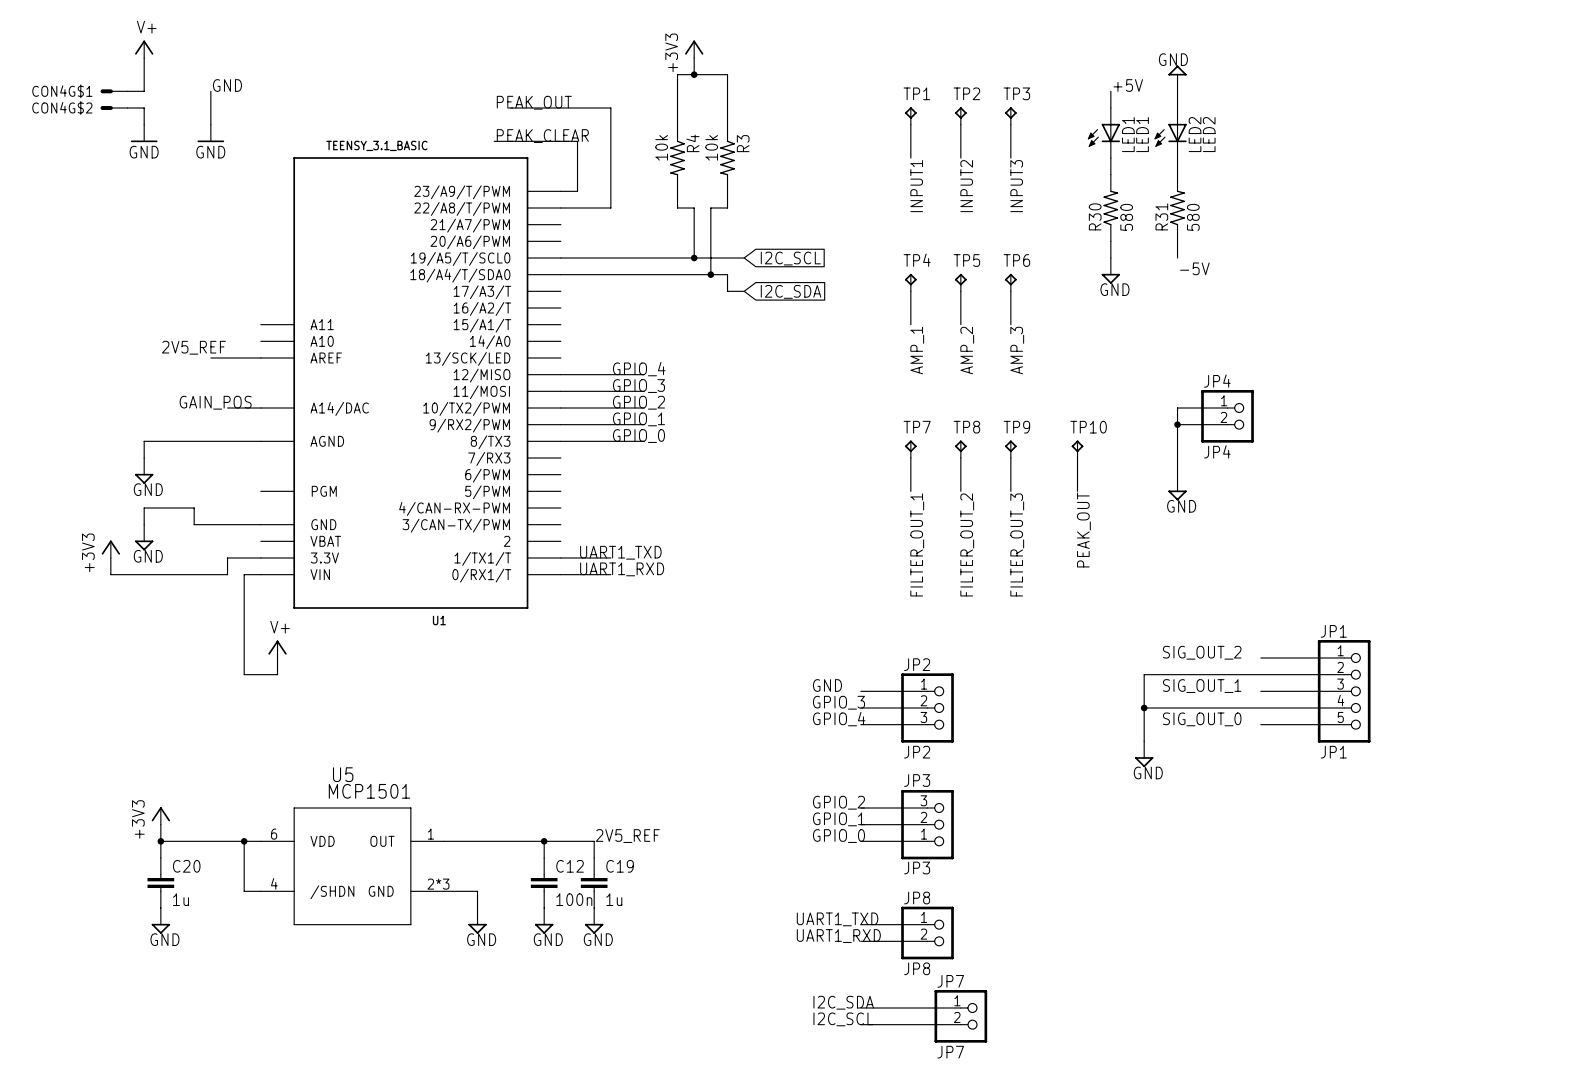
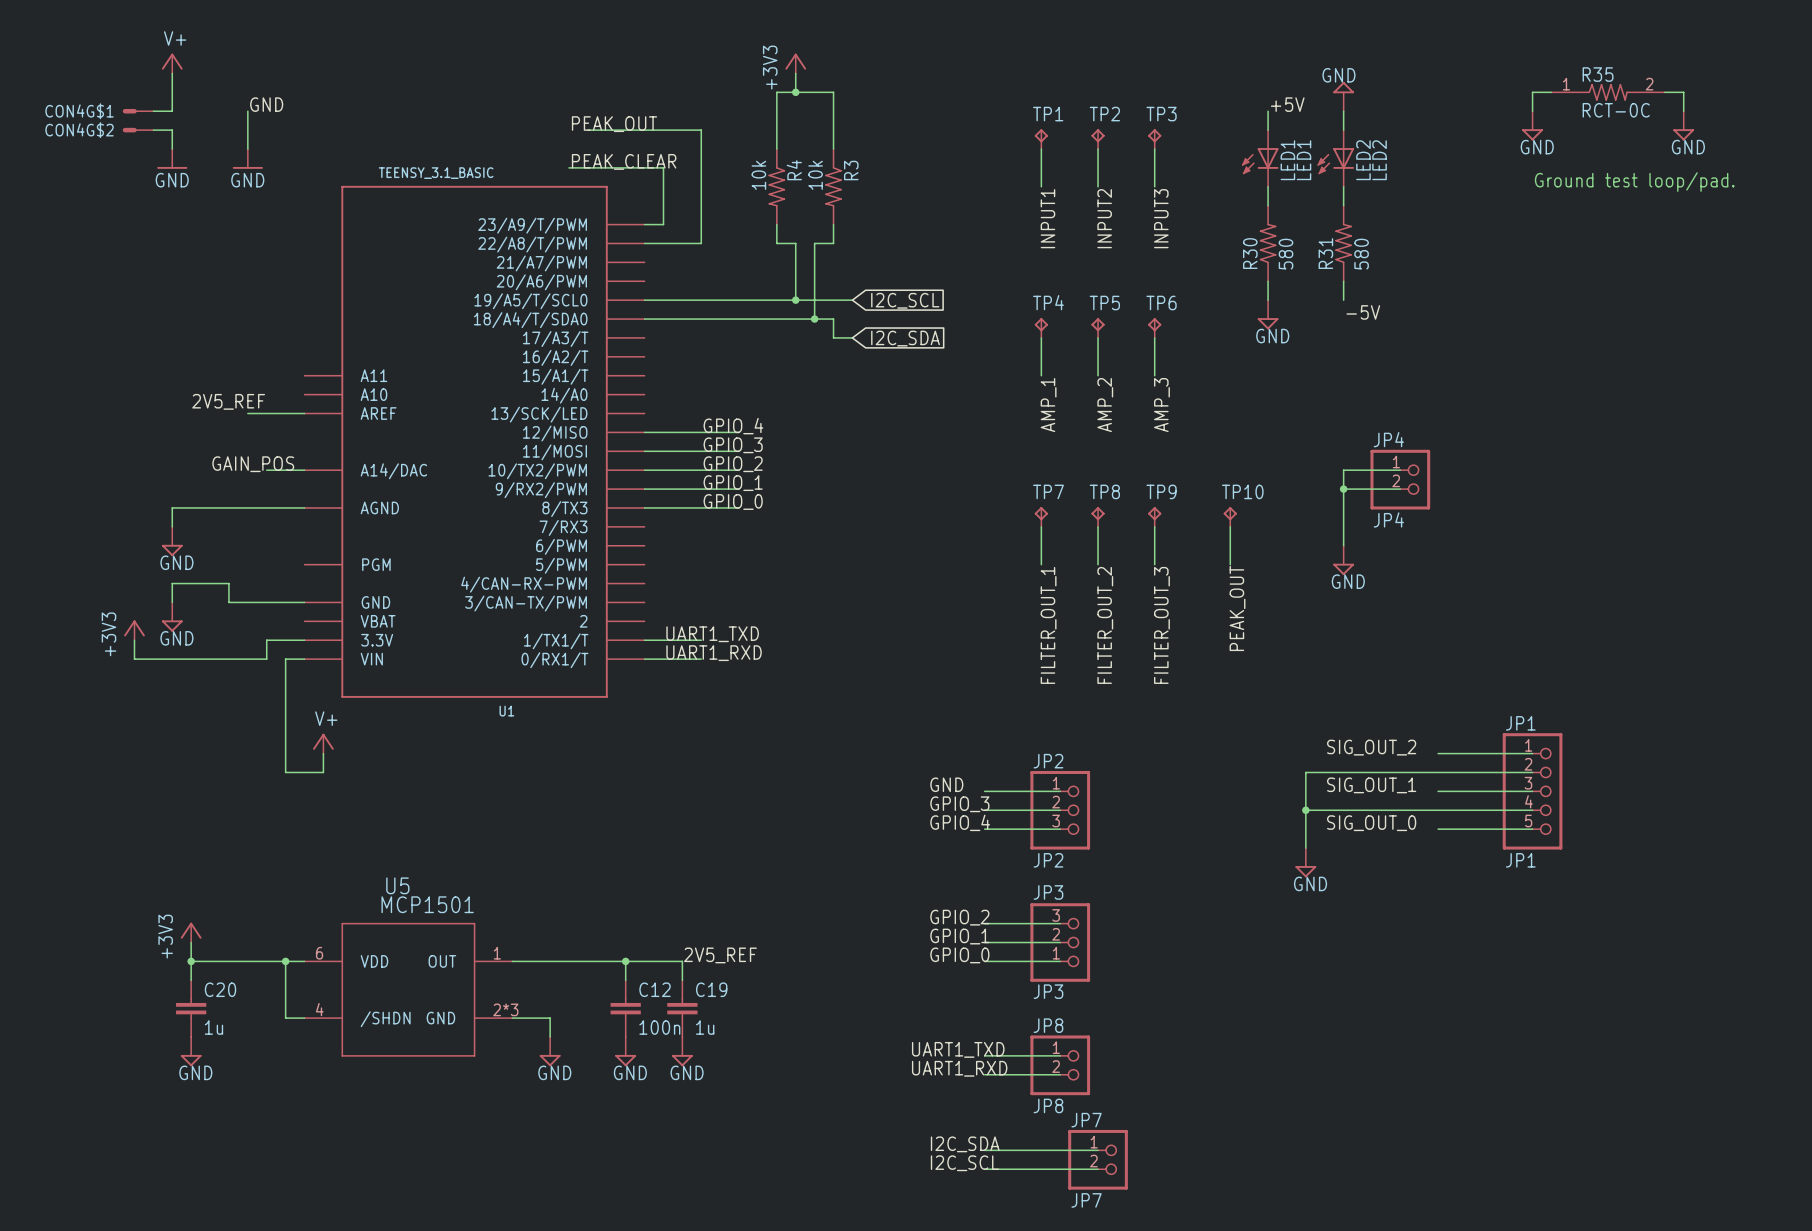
wire: none -> (1551, 92) (1532, 92) (1532, 111)
R35: none -> RCT-0C (1608, 92)
wire: none -> (1664, 92) (1683, 92) (1683, 111)
power symbol: none -> GND (1532, 125)
power symbol: none -> GND (1683, 125)
text: none -> Ground test loop/pad. (1634, 182)

